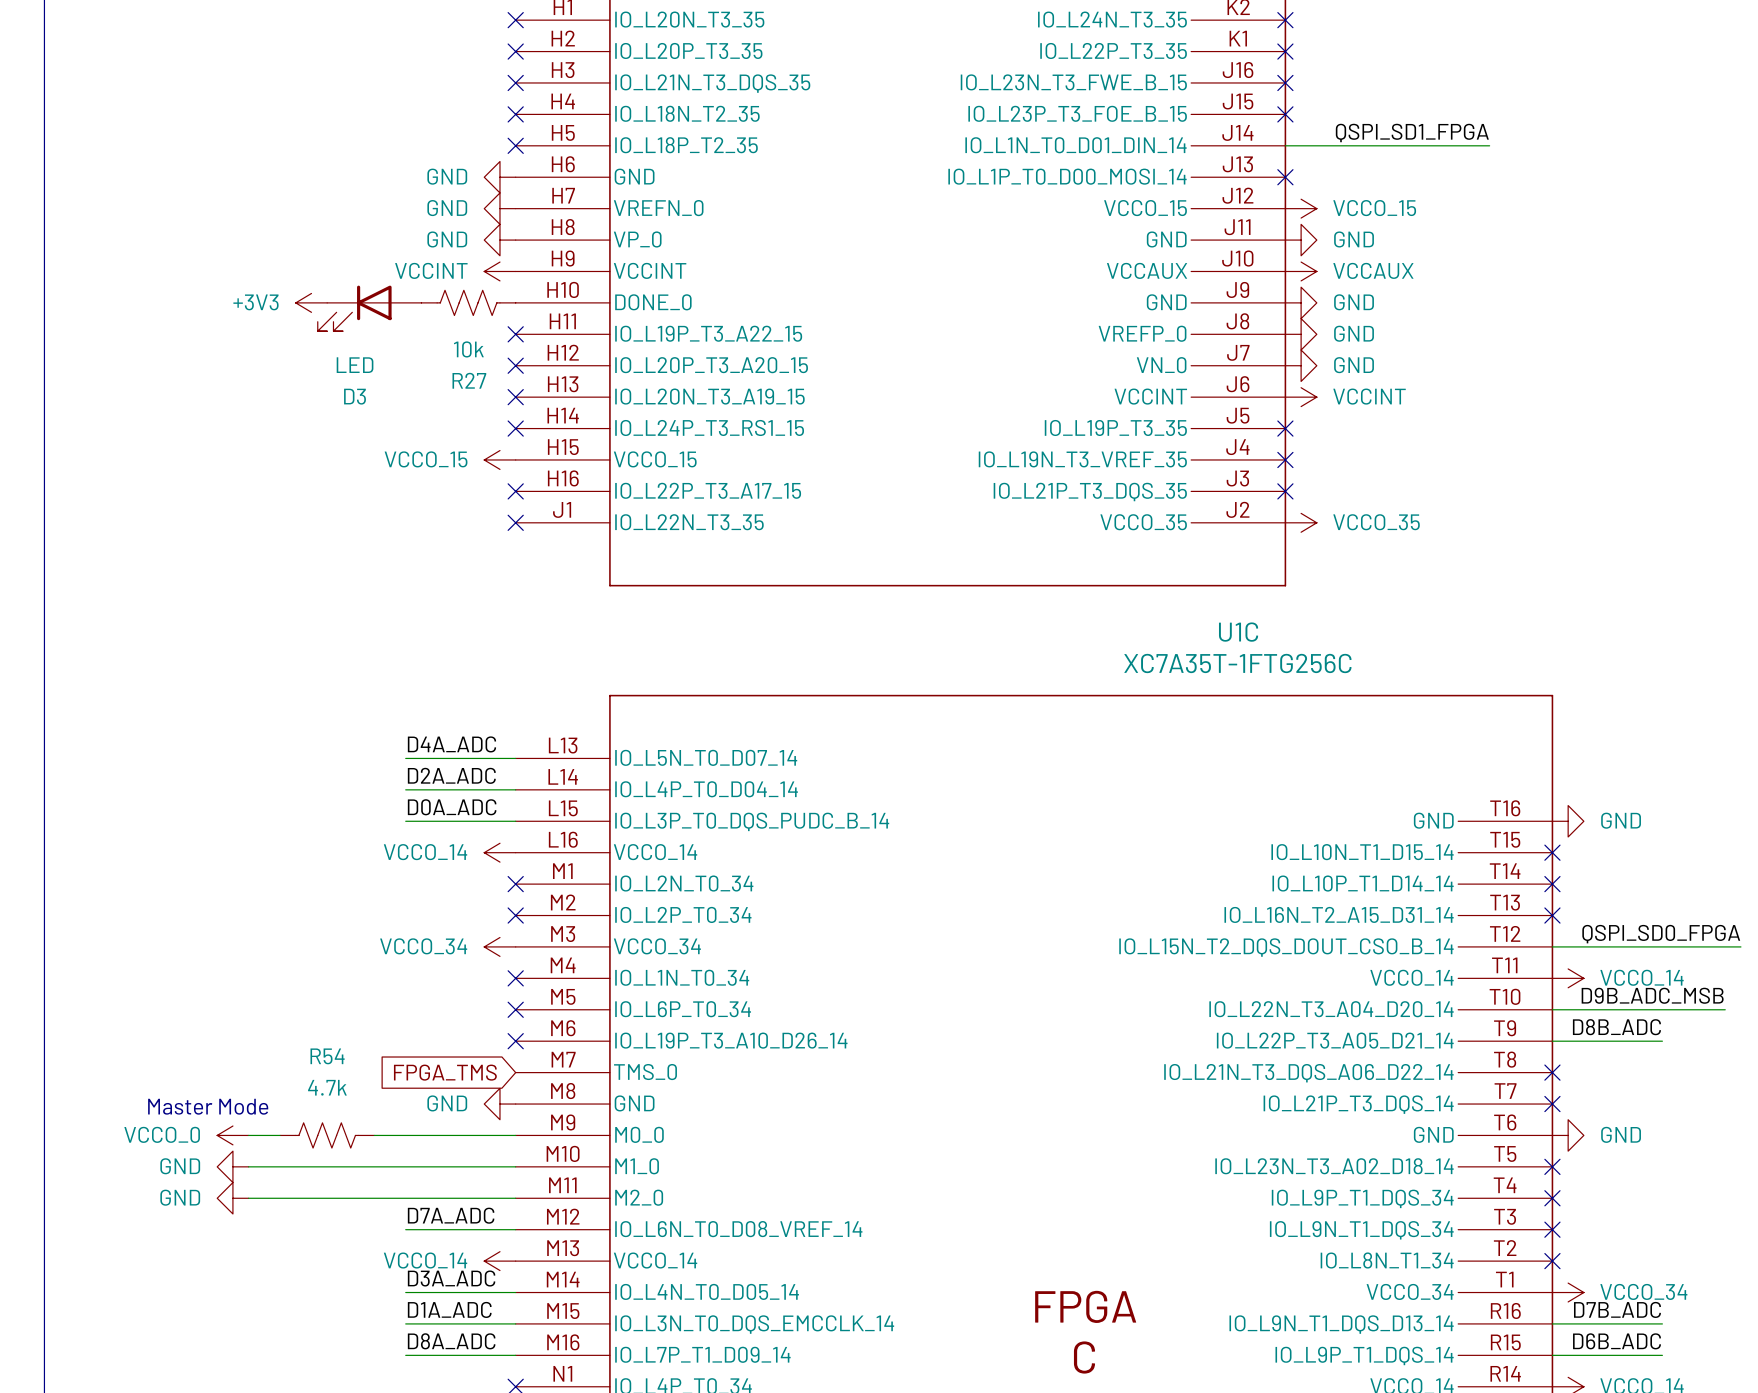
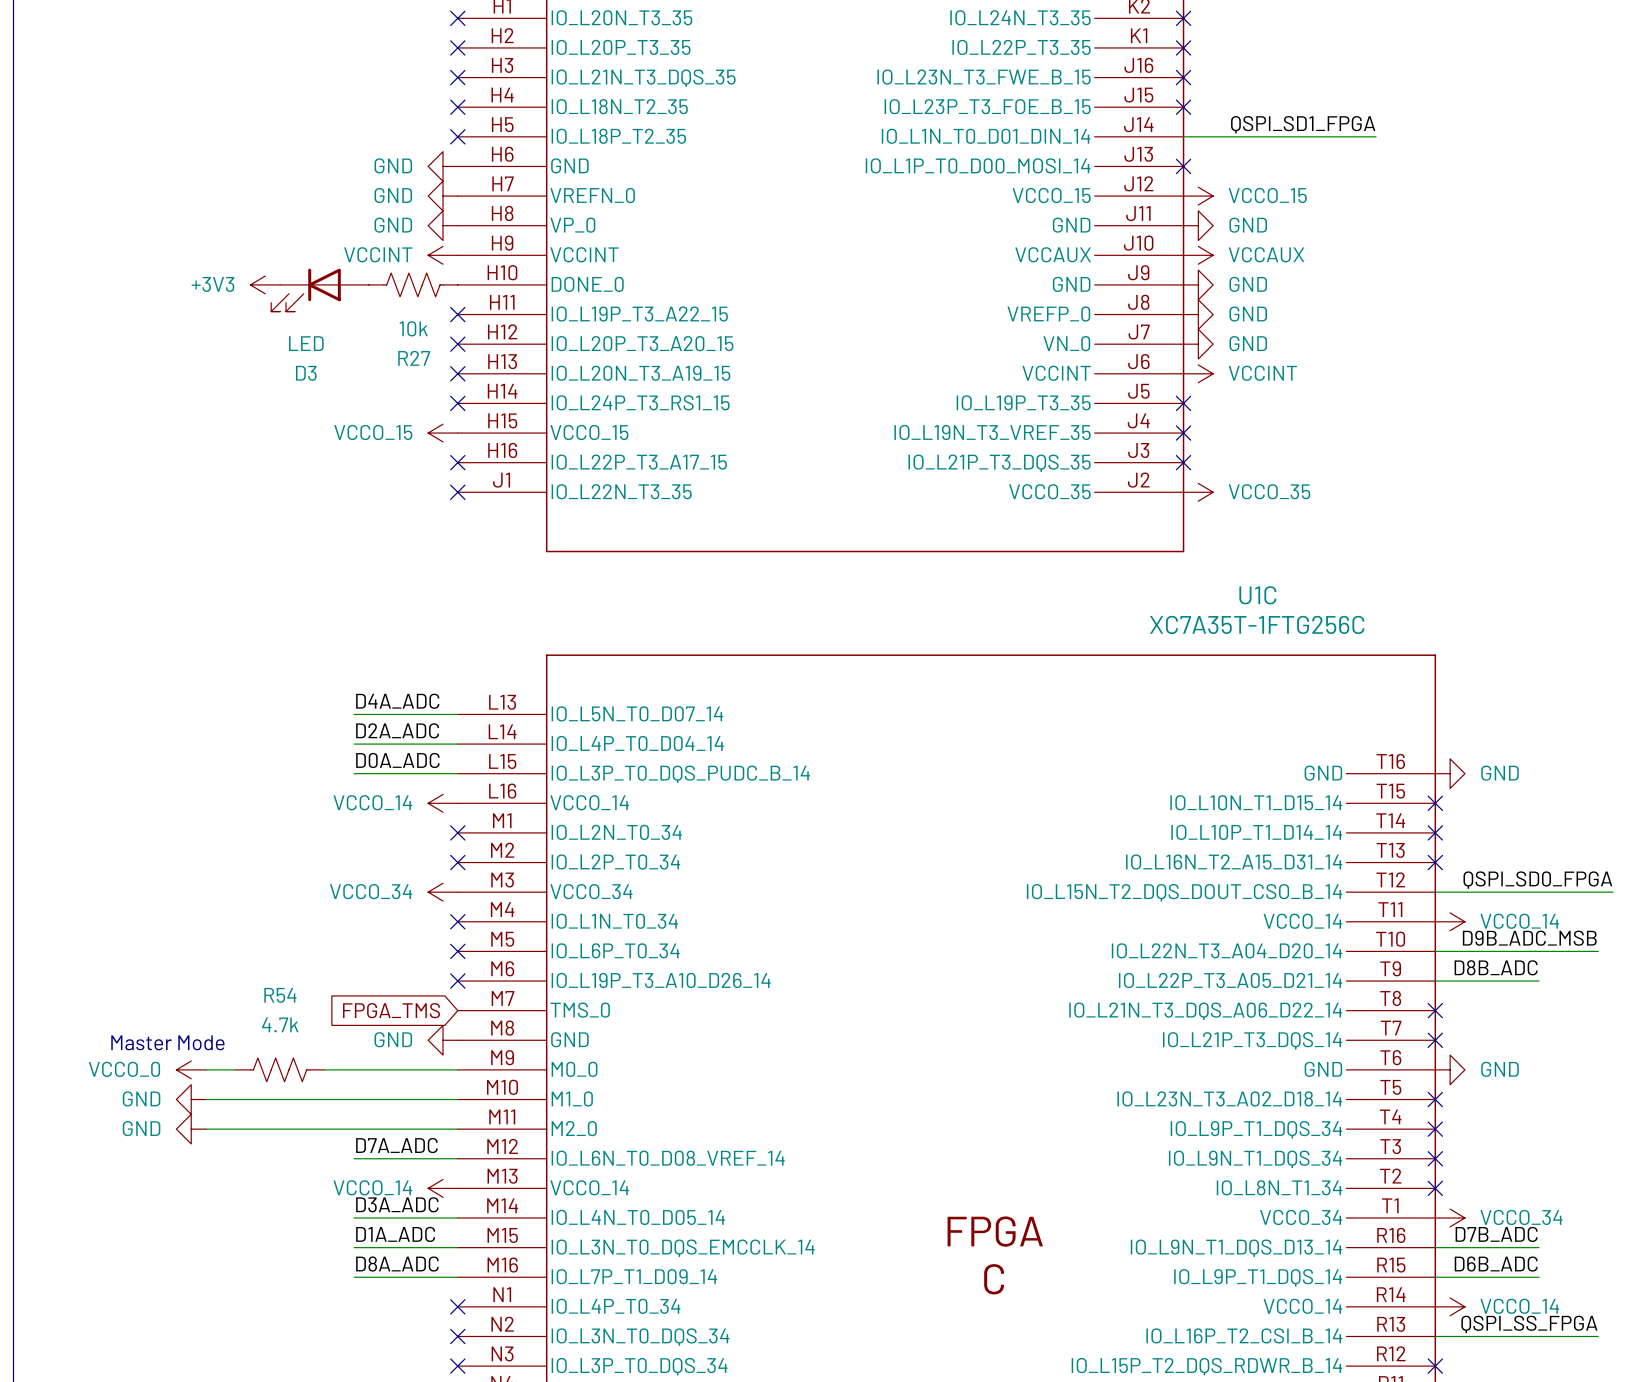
U1C name position: U1C (1238, 632) -> U1C (1257, 595)
U1C value position: XC7A35T-1FTG256C (1237, 663) -> XC7A35T-1FTG256C (1257, 624)

